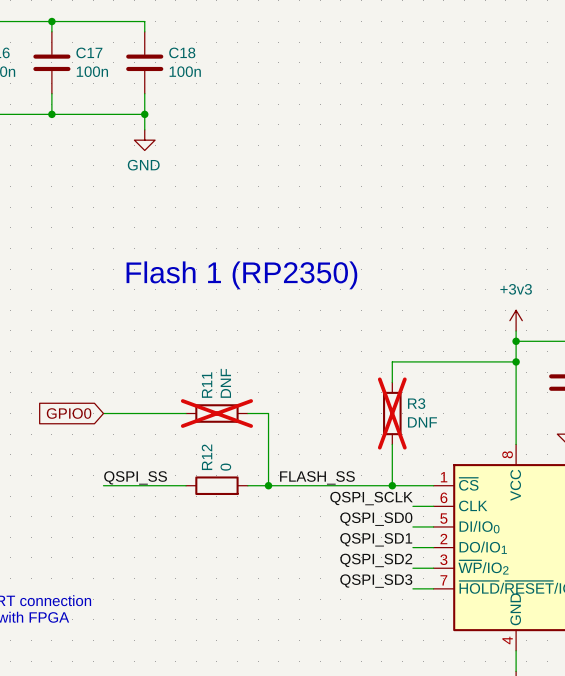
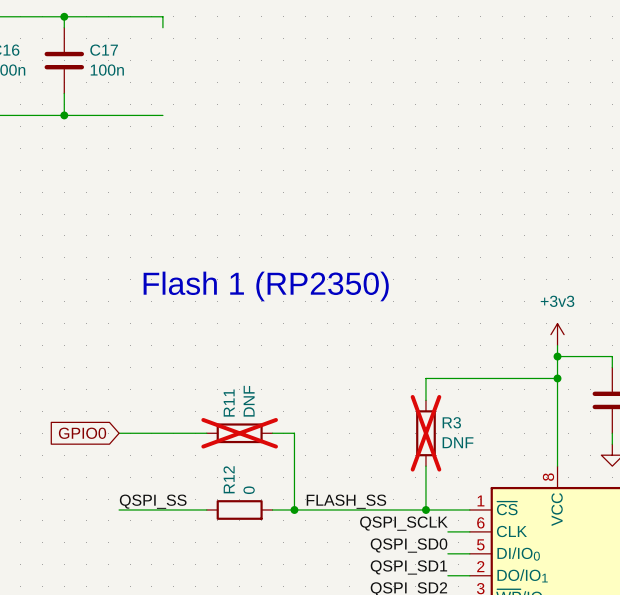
C18: 100n (144, 62) -> none
wire: (144, 93) (144, 129) -> none
junction: (144, 114) -> none
power symbol: GND (144, 140) -> none

